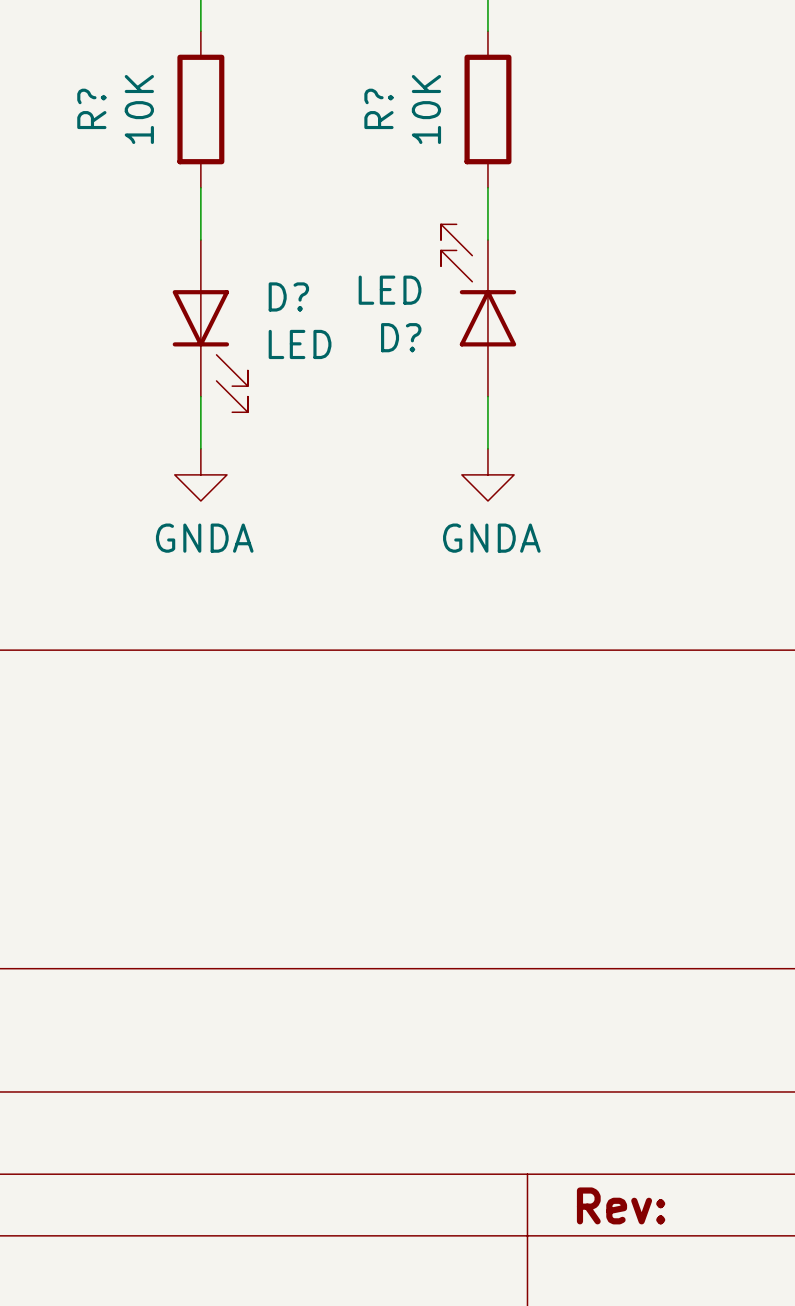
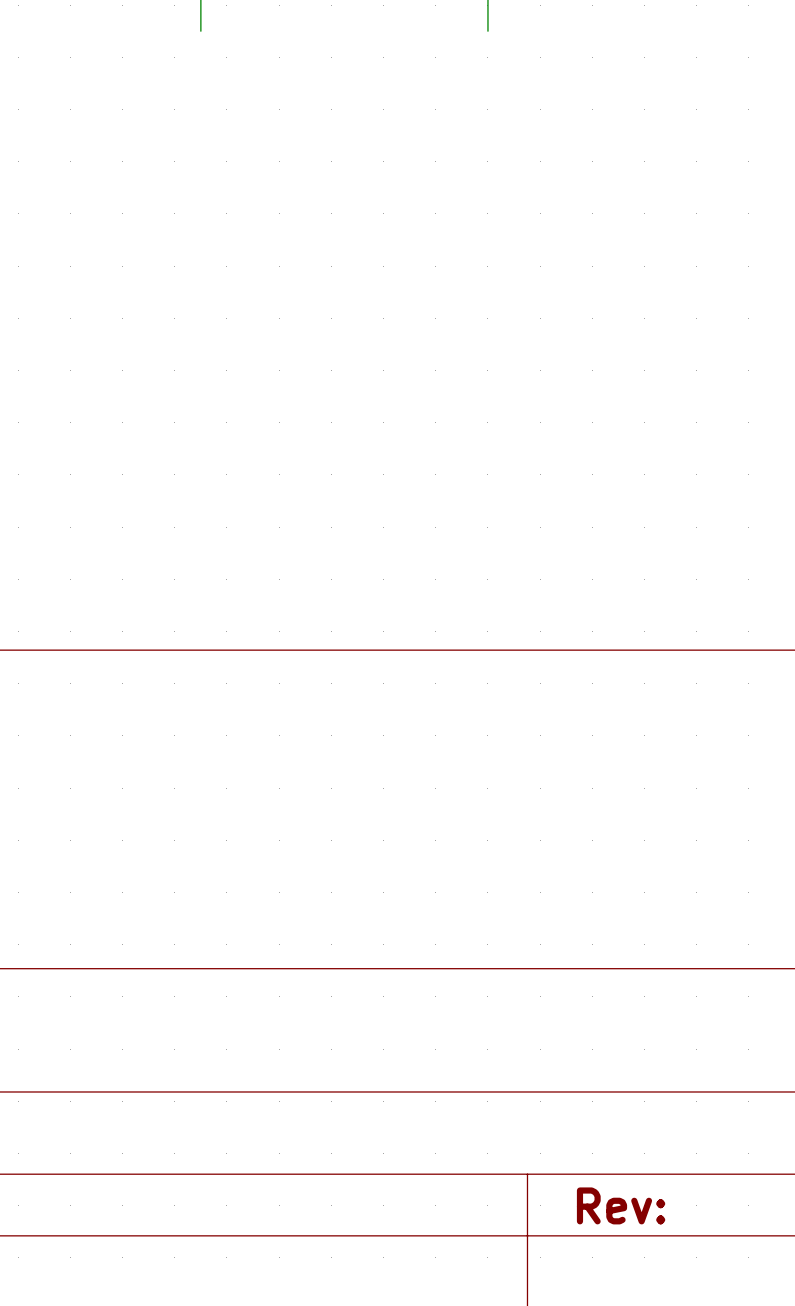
R?: 10K (200, 109) -> none
R?: 10K (487, 109) -> none
wire: (200, 187) (200, 239) -> none
wire: (487, 187) (487, 239) -> none
D?: LED (478, 310) -> none
D?: LED (210, 326) -> none
wire: (200, 396) (200, 448) -> none
wire: (487, 396) (487, 448) -> none
power symbol: GNDA (200, 474) -> none
power symbol: GNDA (487, 474) -> none

